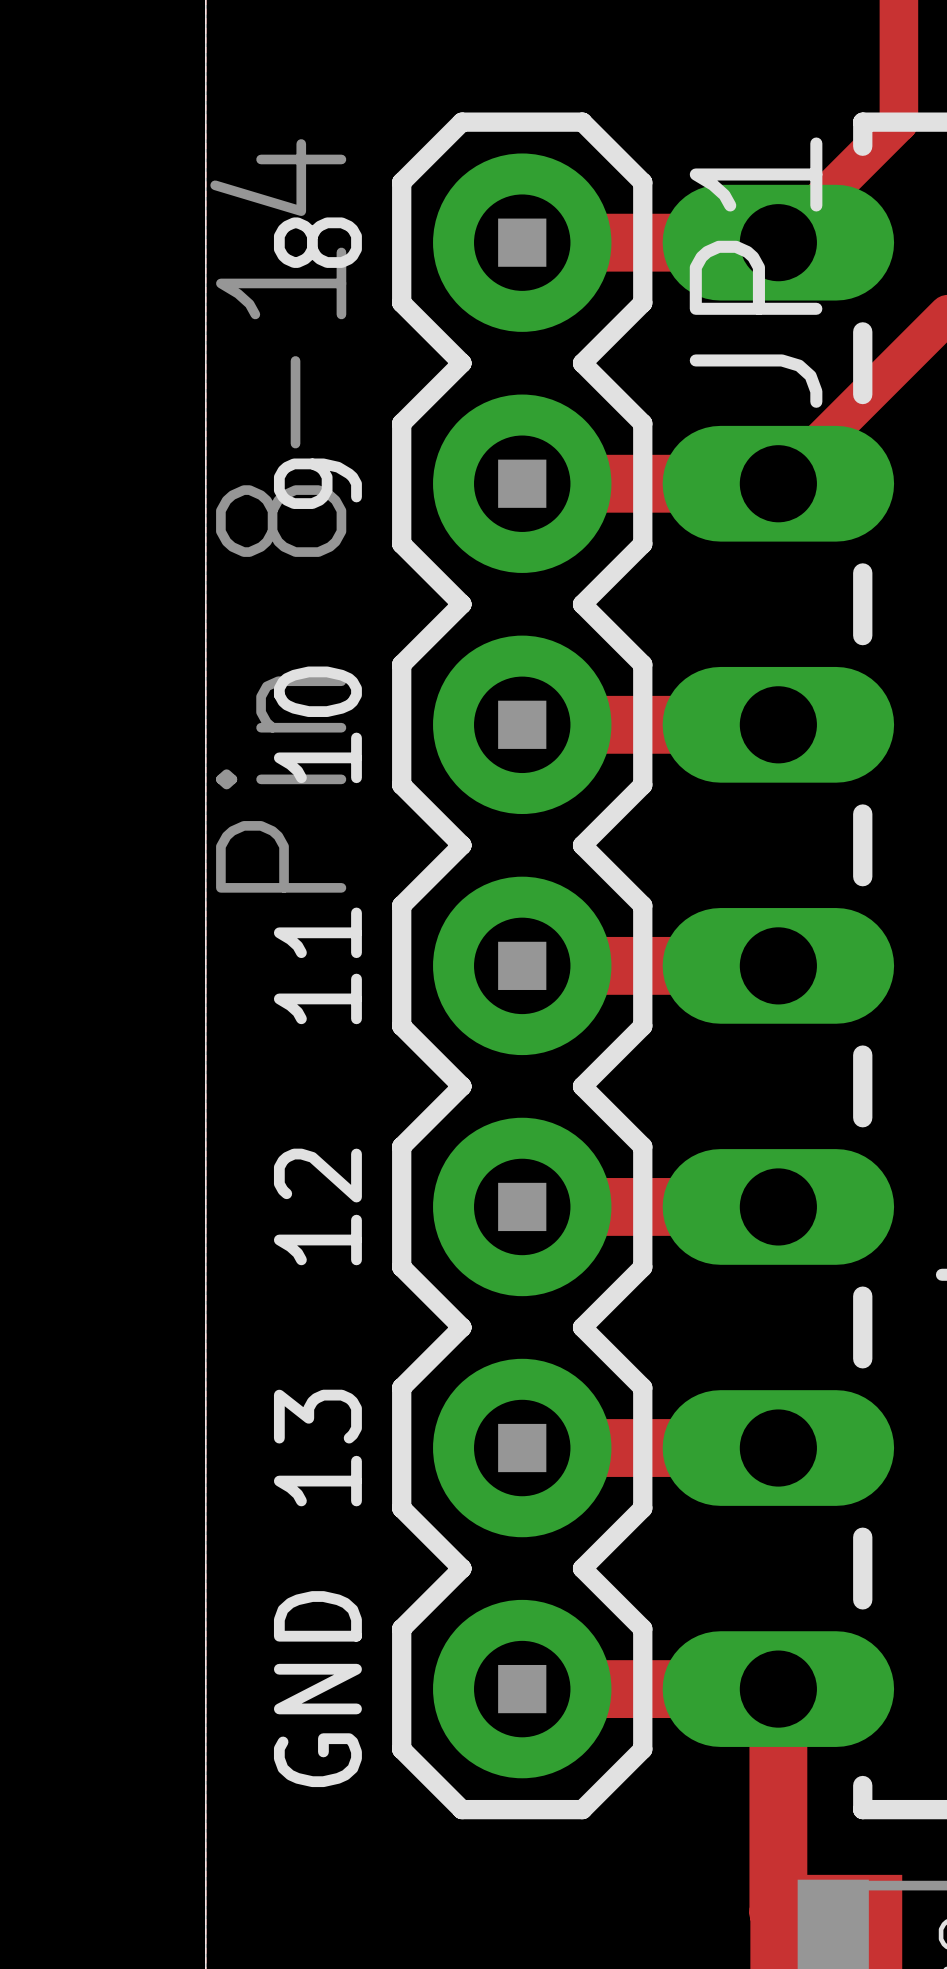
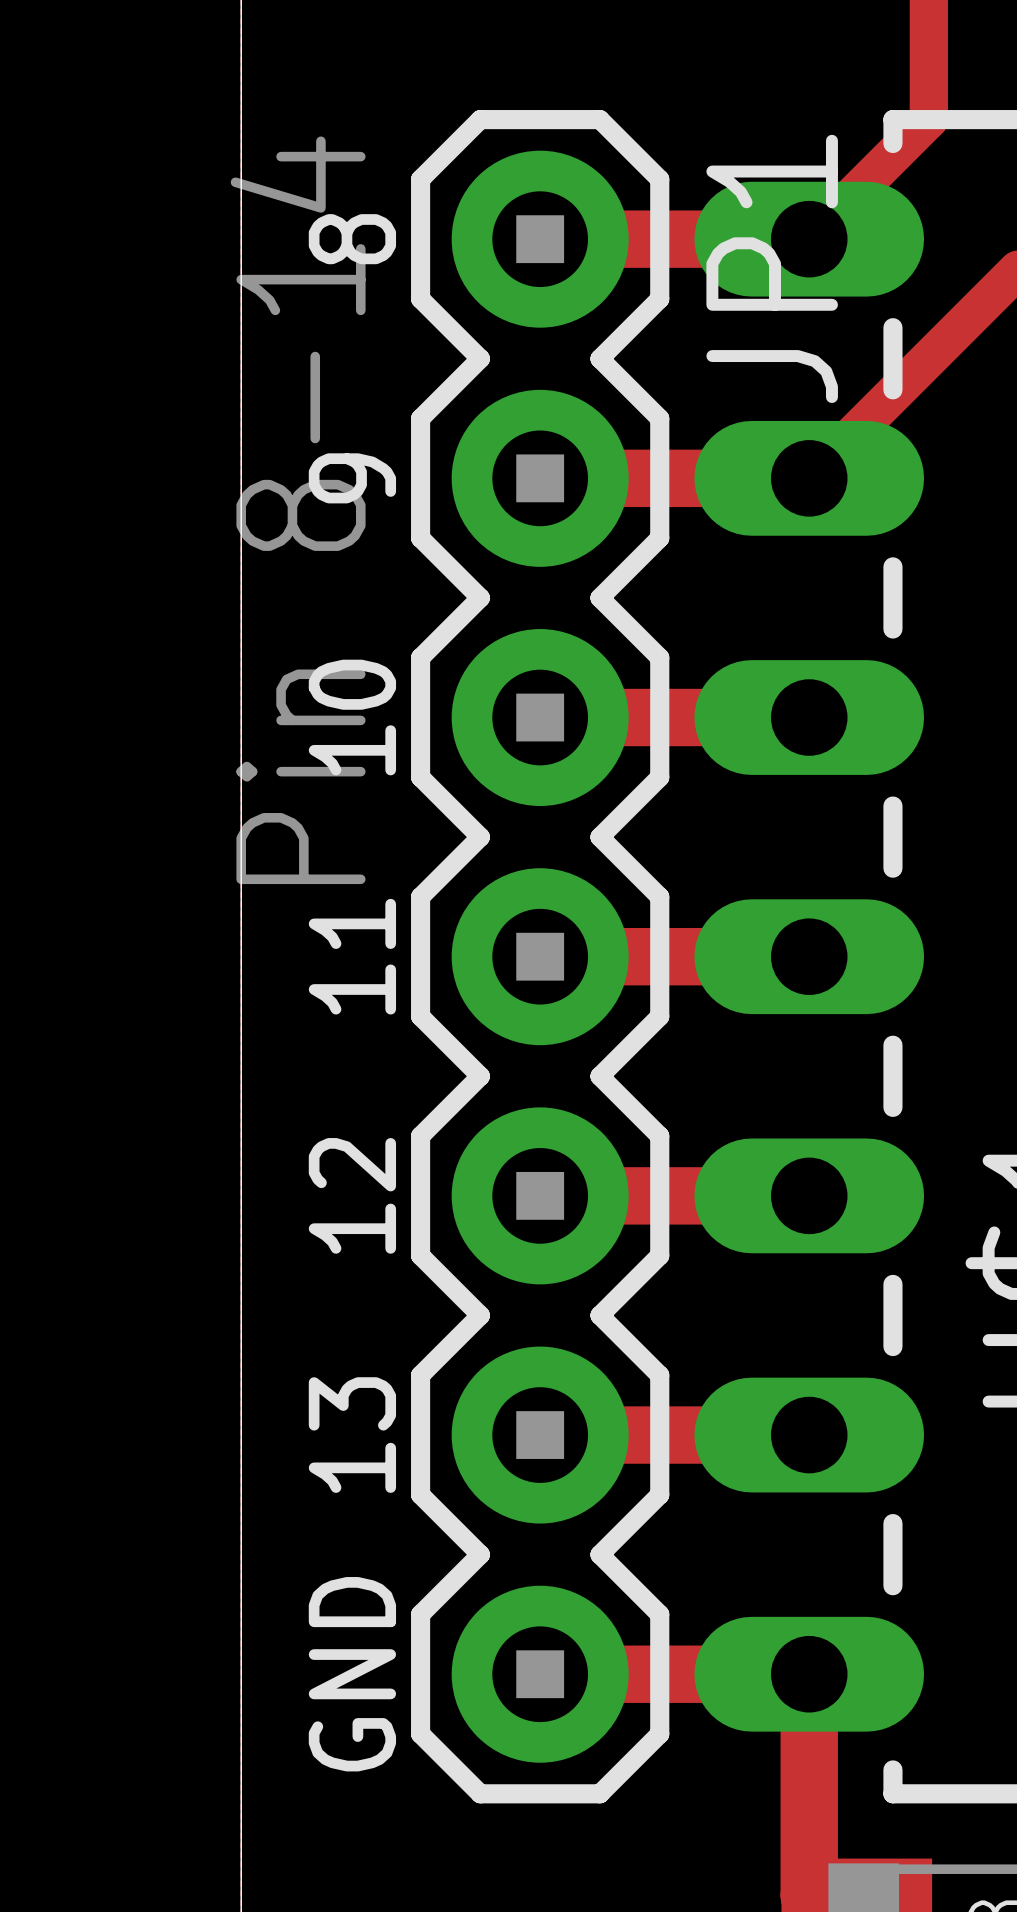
JP1 position: (522, 965) -> (540, 956)

